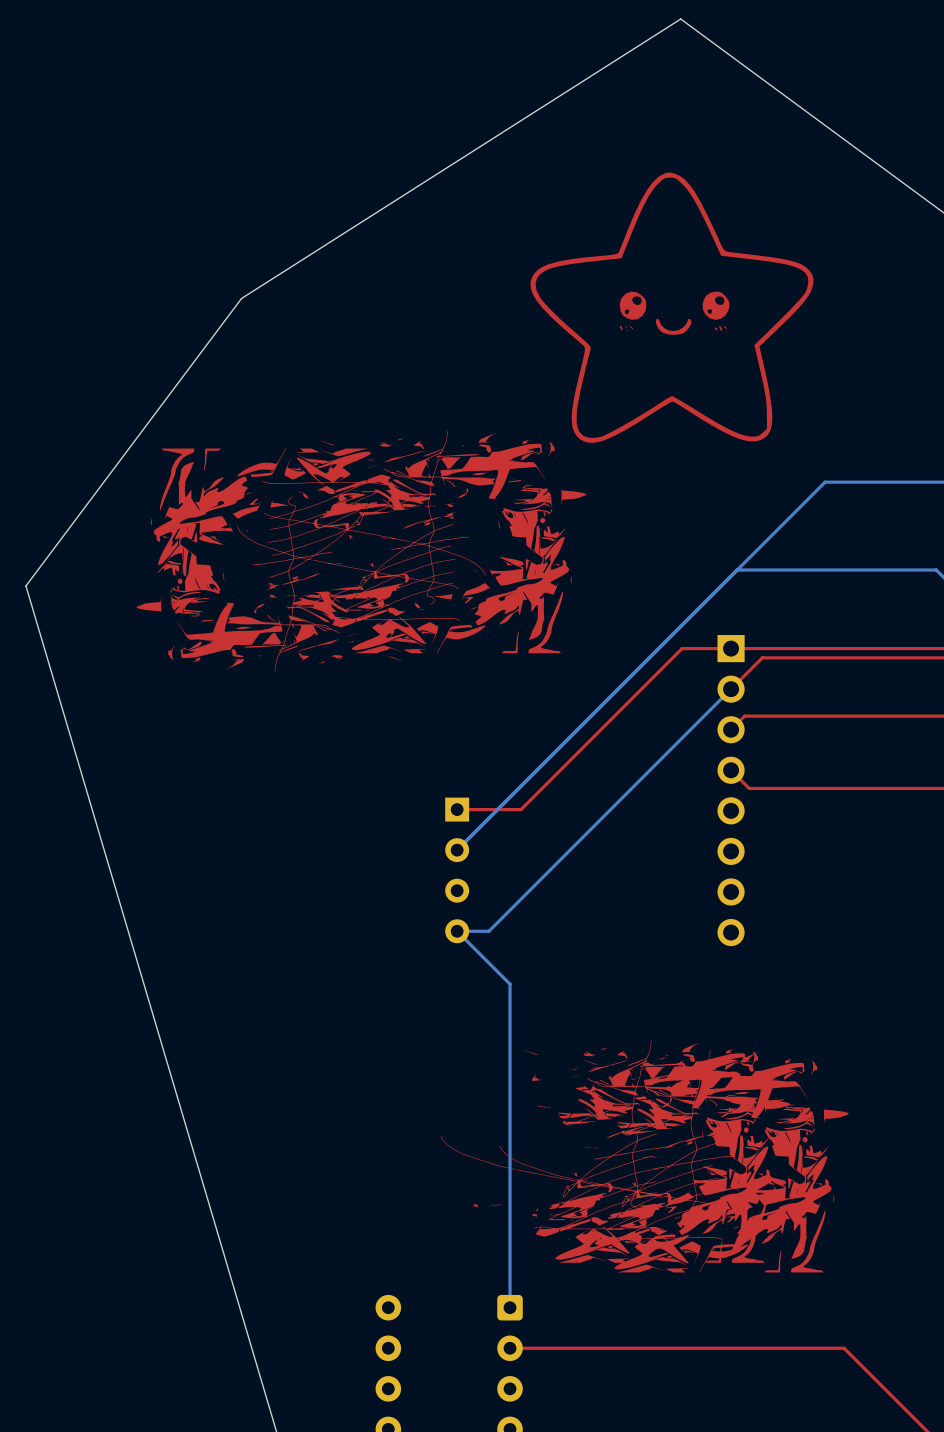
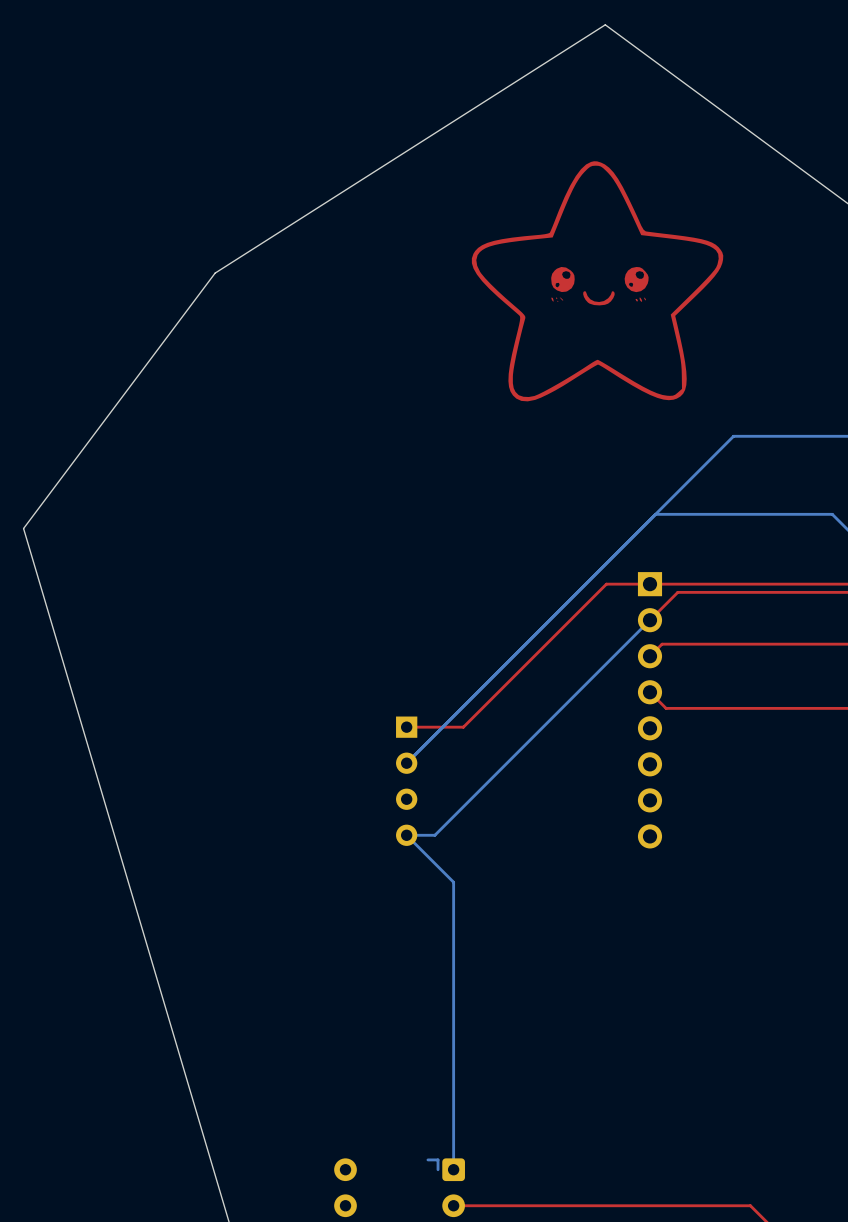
drawing: [136, 430, 587, 672] -> none
drawing: [440, 1039, 849, 1273] -> none
bottom track: none -> (427, 1159) (438, 1159) (438, 1169)

